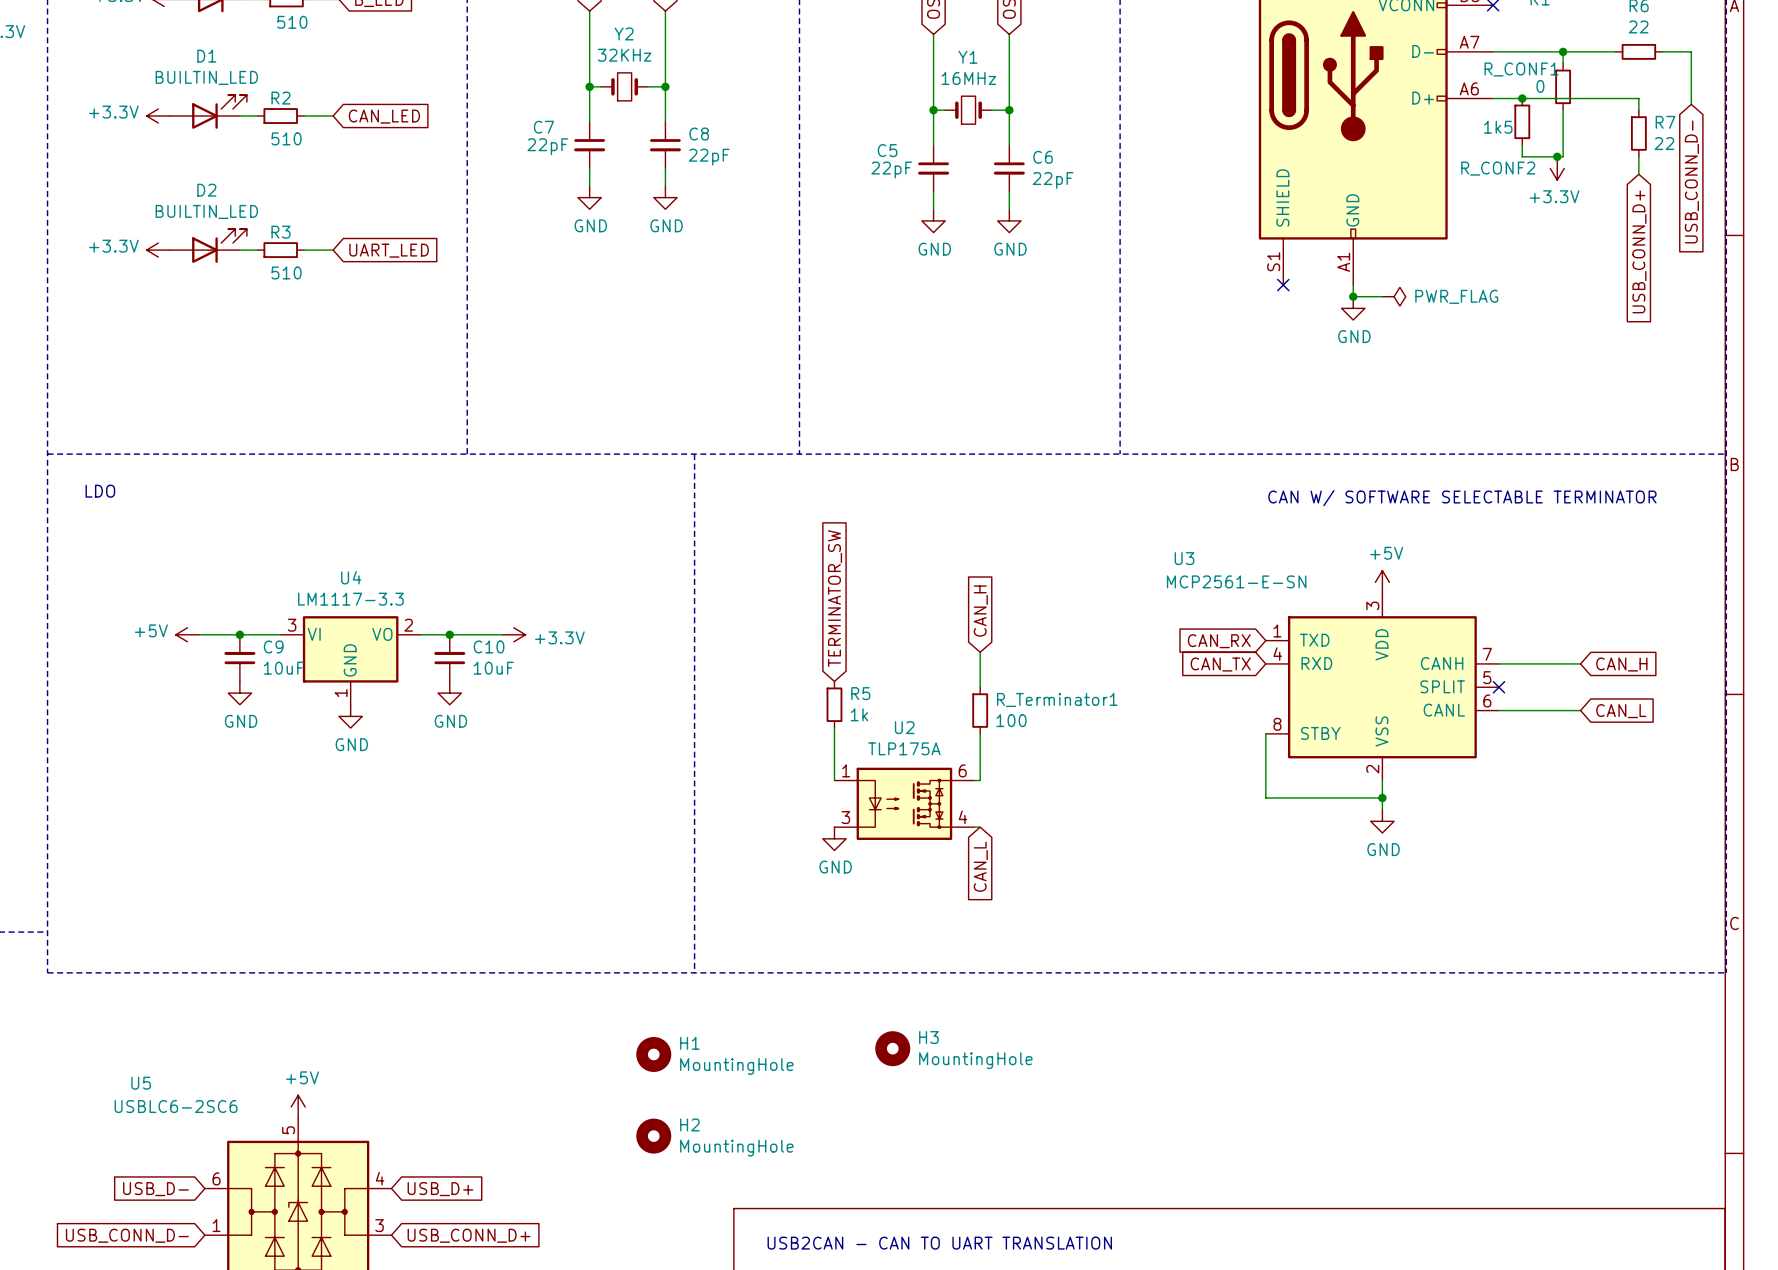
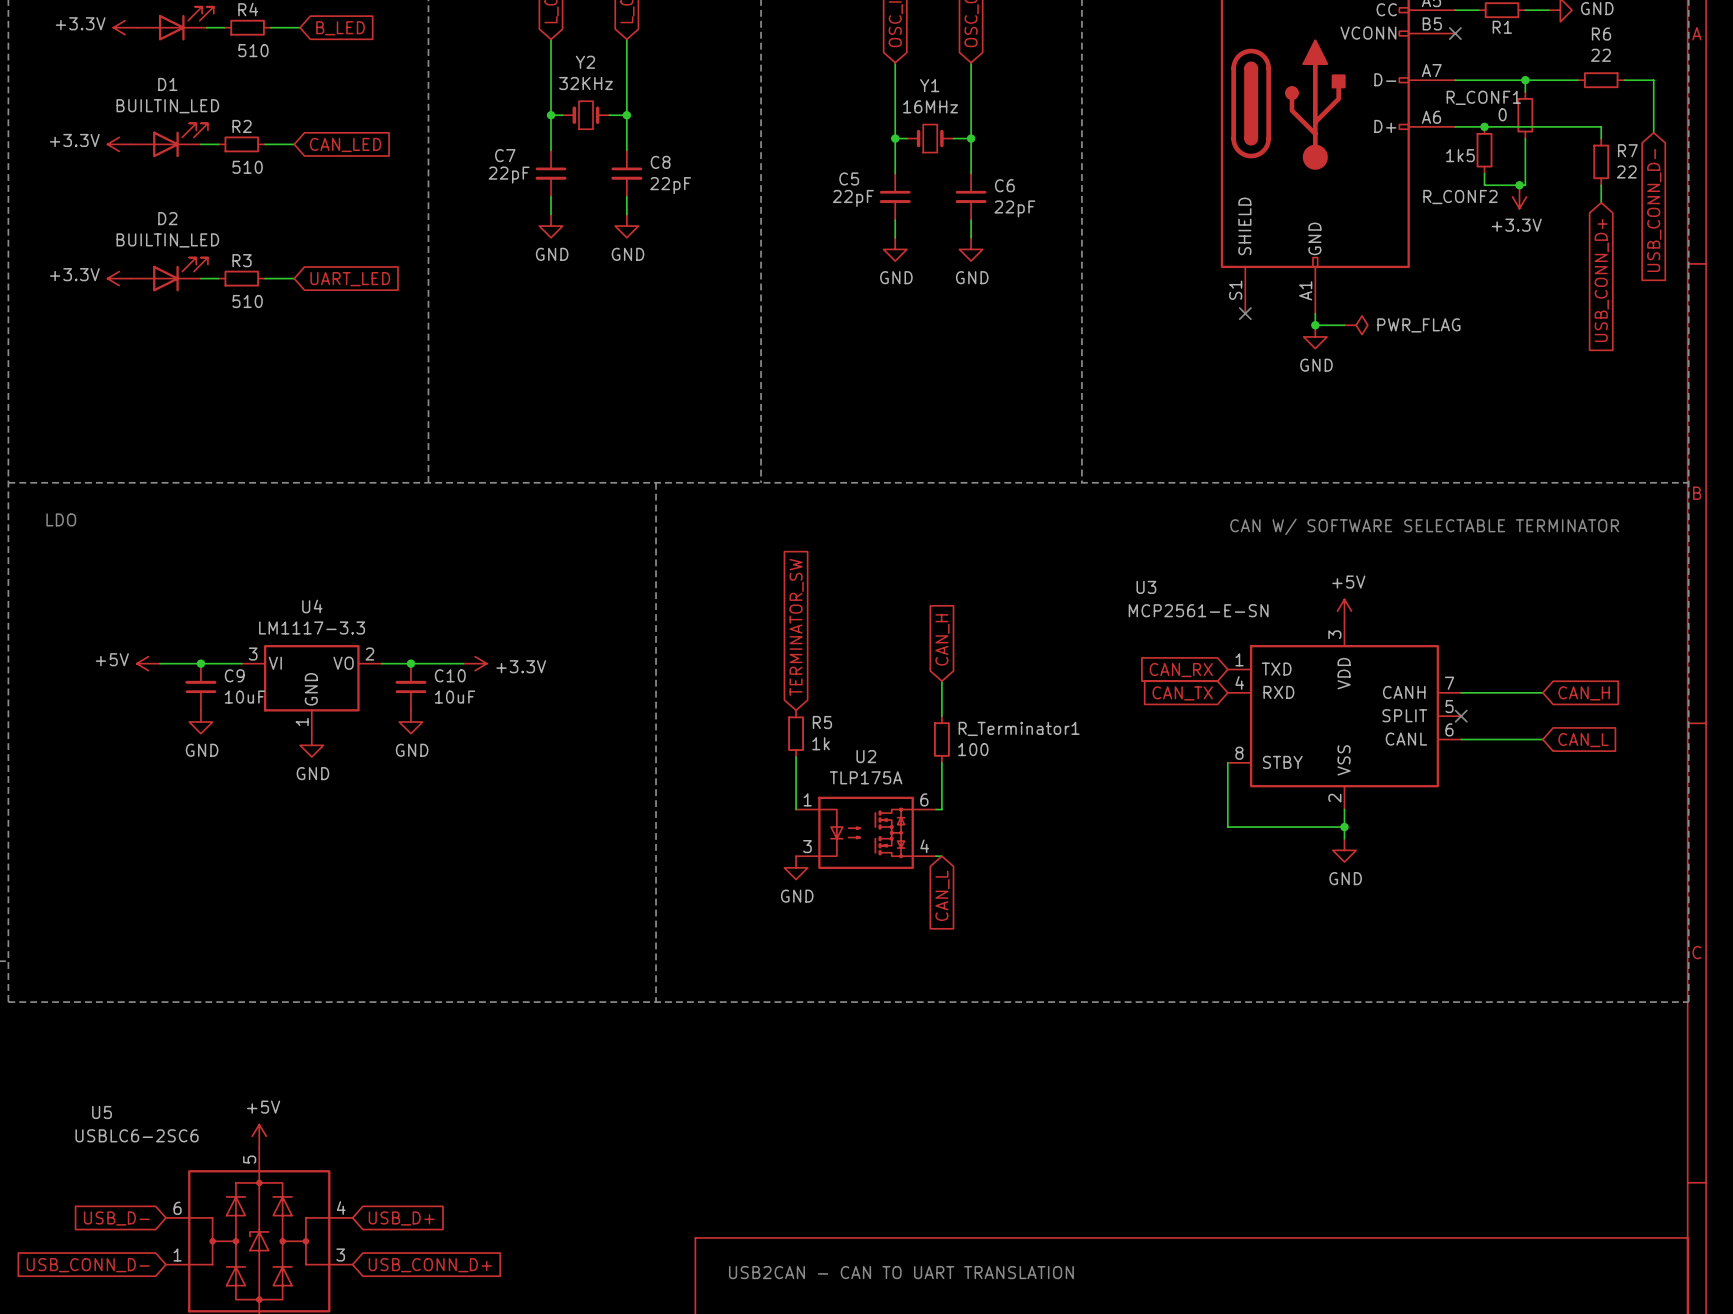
H3: MountingHole (892, 1048) -> none
H1: MountingHole (653, 1054) -> none
H2: MountingHole (653, 1136) -> none

